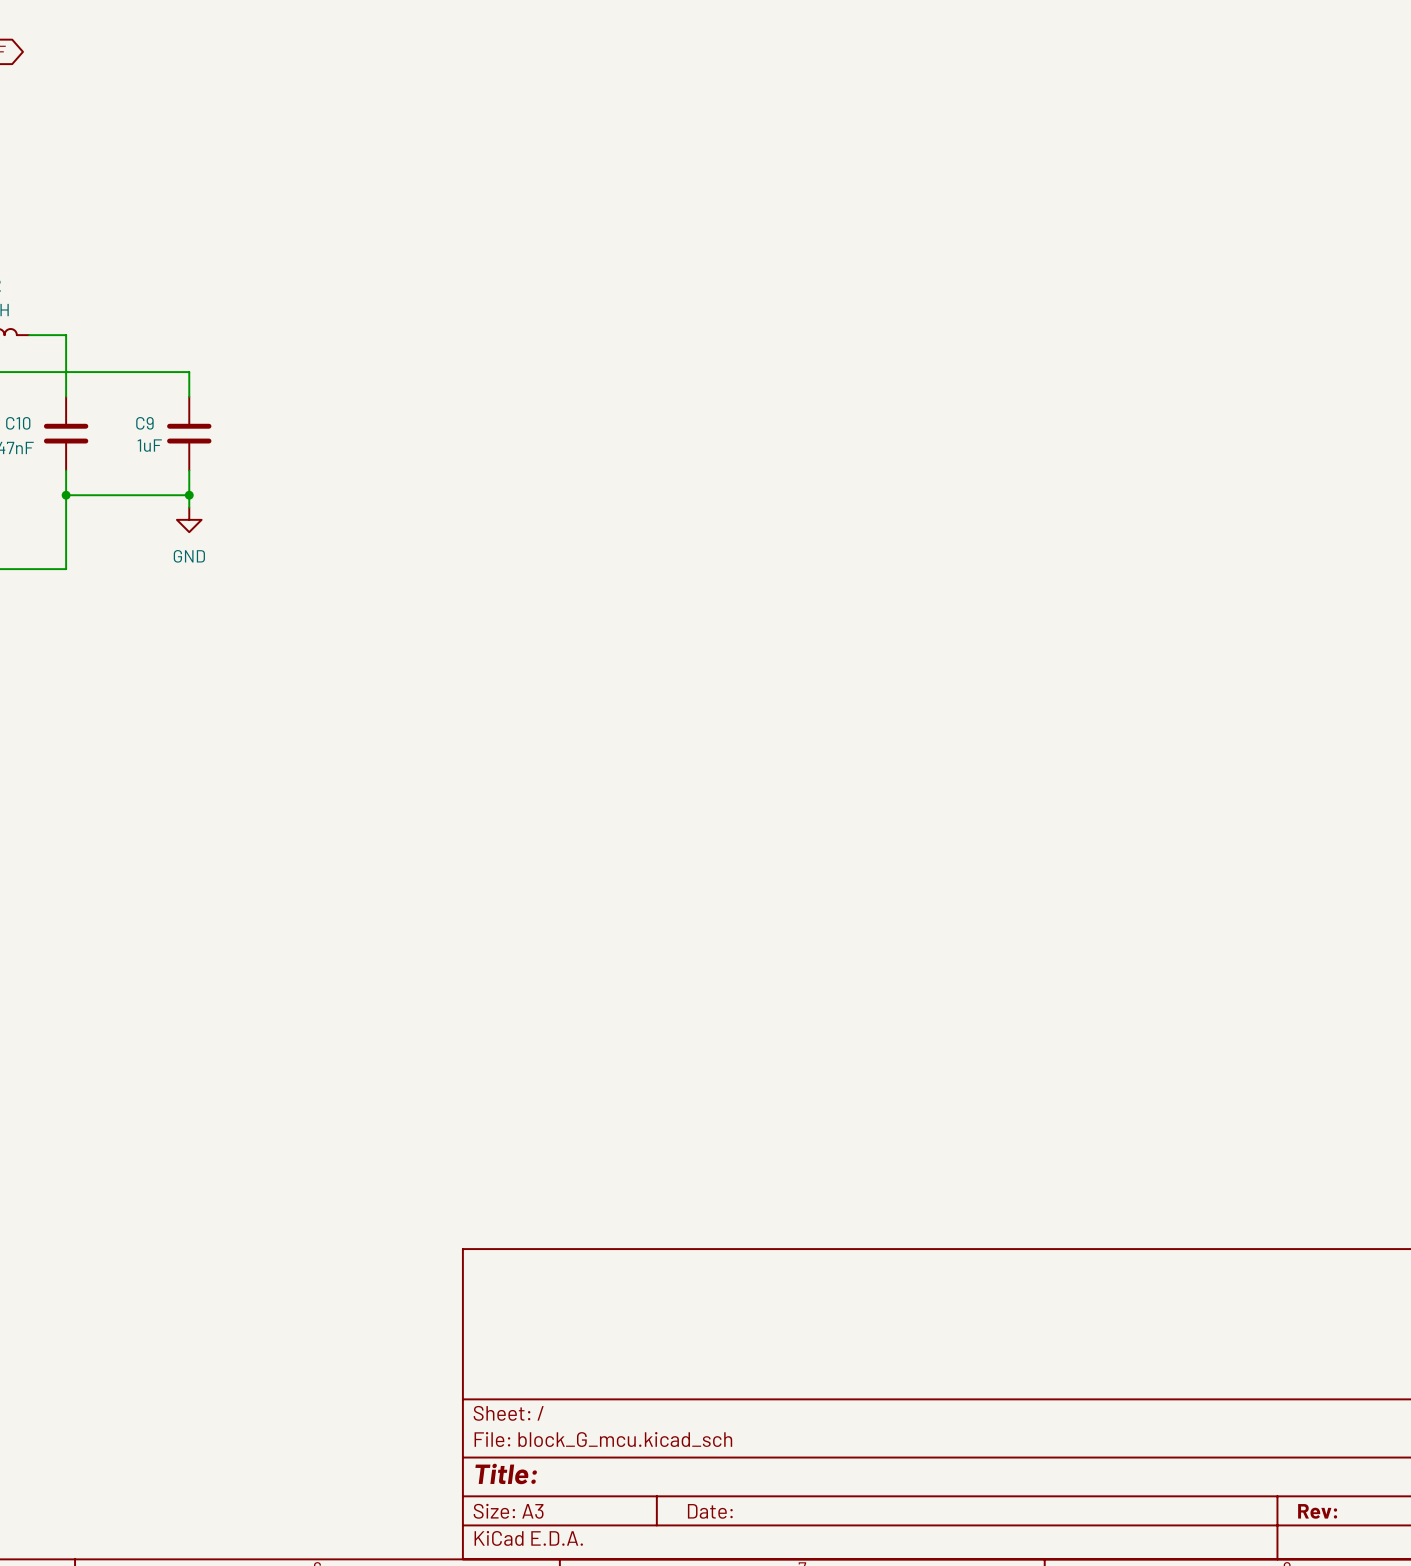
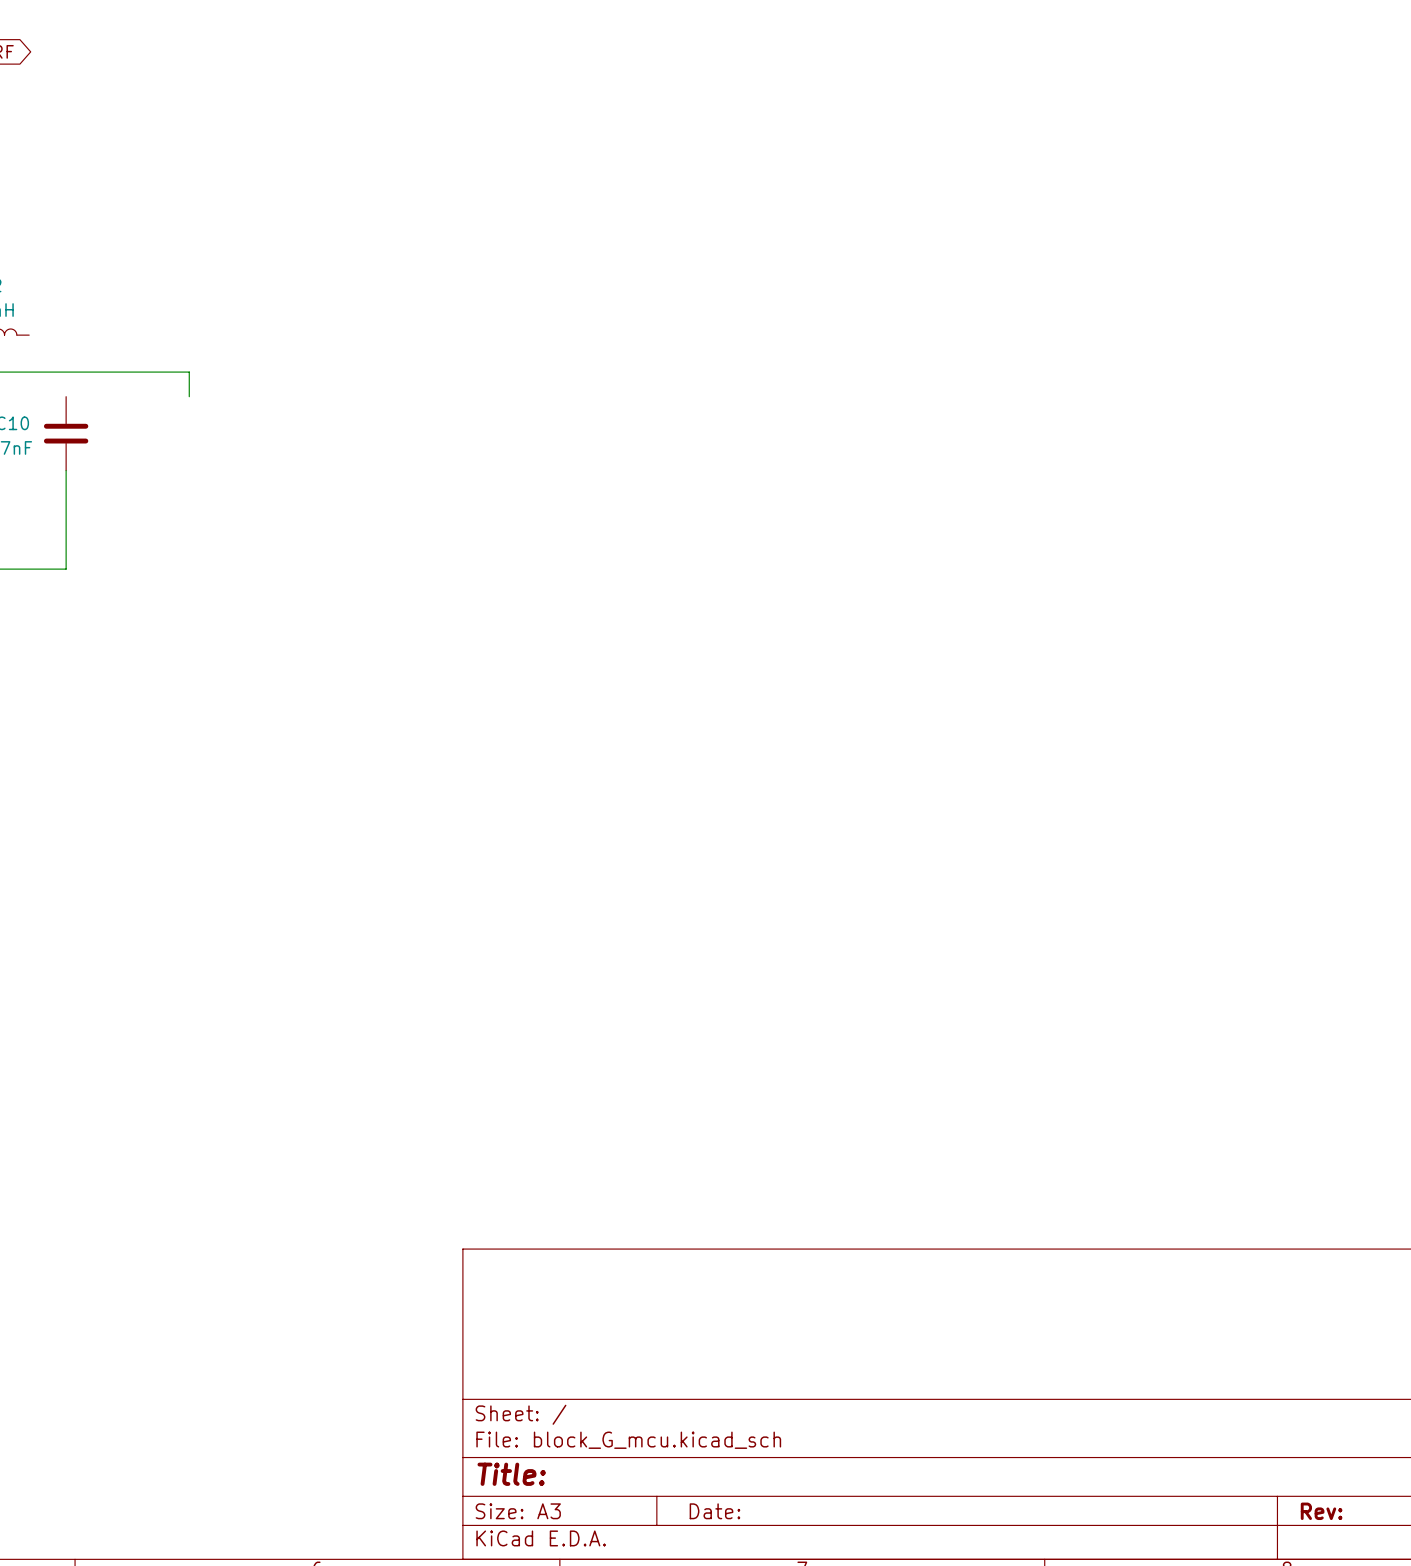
wire: (29, 335) (66, 335) (66, 396) -> none
C9: 1uF (189, 433) -> none
wire: (189, 470) (189, 507) -> none
wire: (66, 495) (189, 495) -> none
junction: (66, 495) -> none
junction: (189, 495) -> none
power symbol: GND (189, 519) -> none

